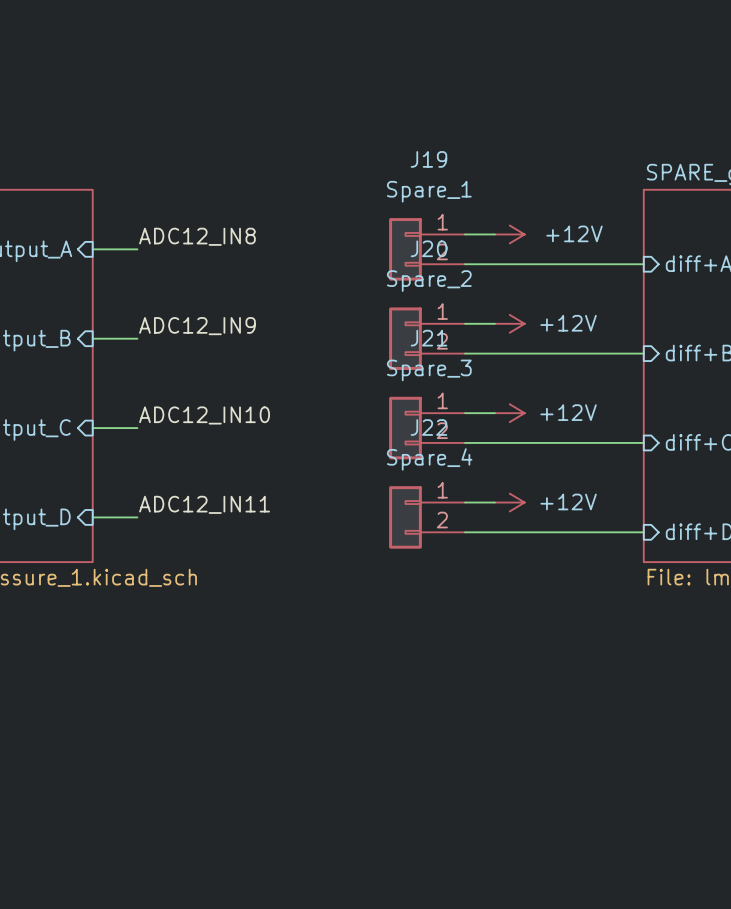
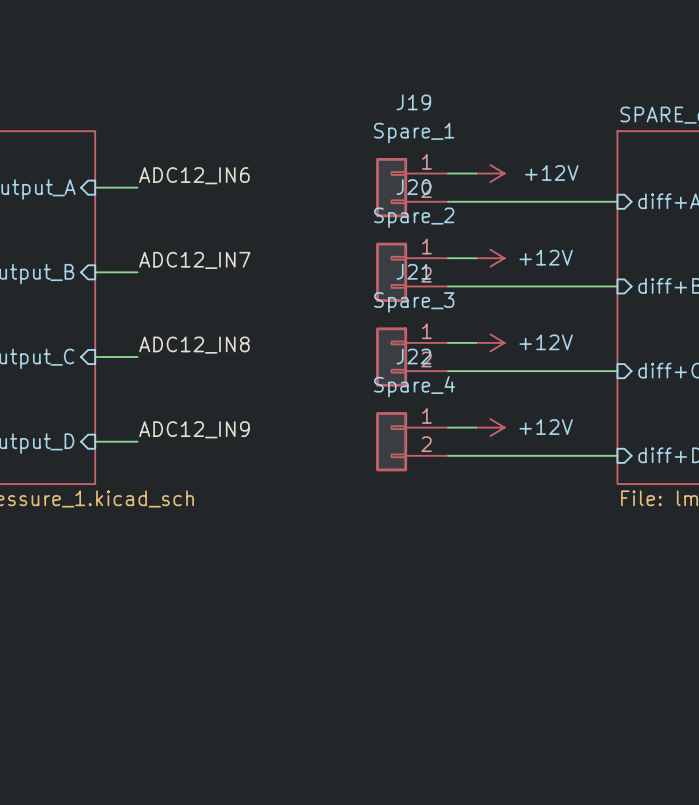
label: ADC12_IN8 (197, 236) -> ADC12_IN6 (194, 175)
label: ADC12_IN9 (197, 326) -> ADC12_IN7 (194, 260)
label: ADC12_IN10 (204, 415) -> ADC12_IN8 (194, 345)
label: ADC12_IN11 (204, 504) -> ADC12_IN9 (194, 429)

